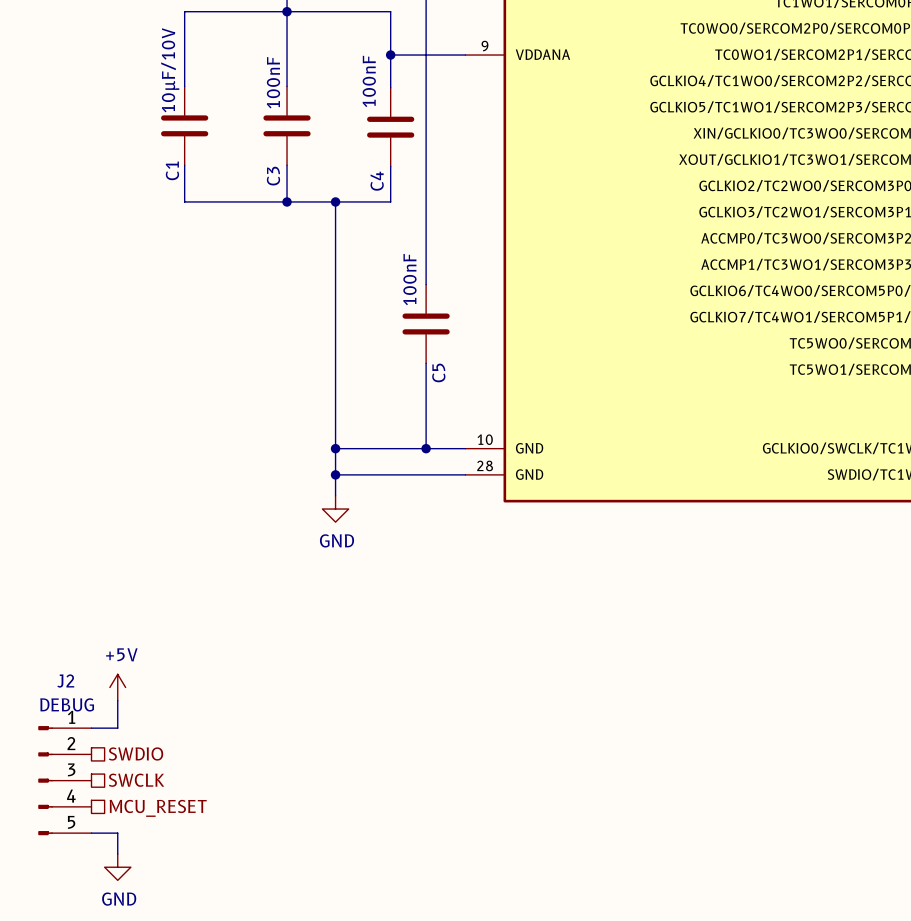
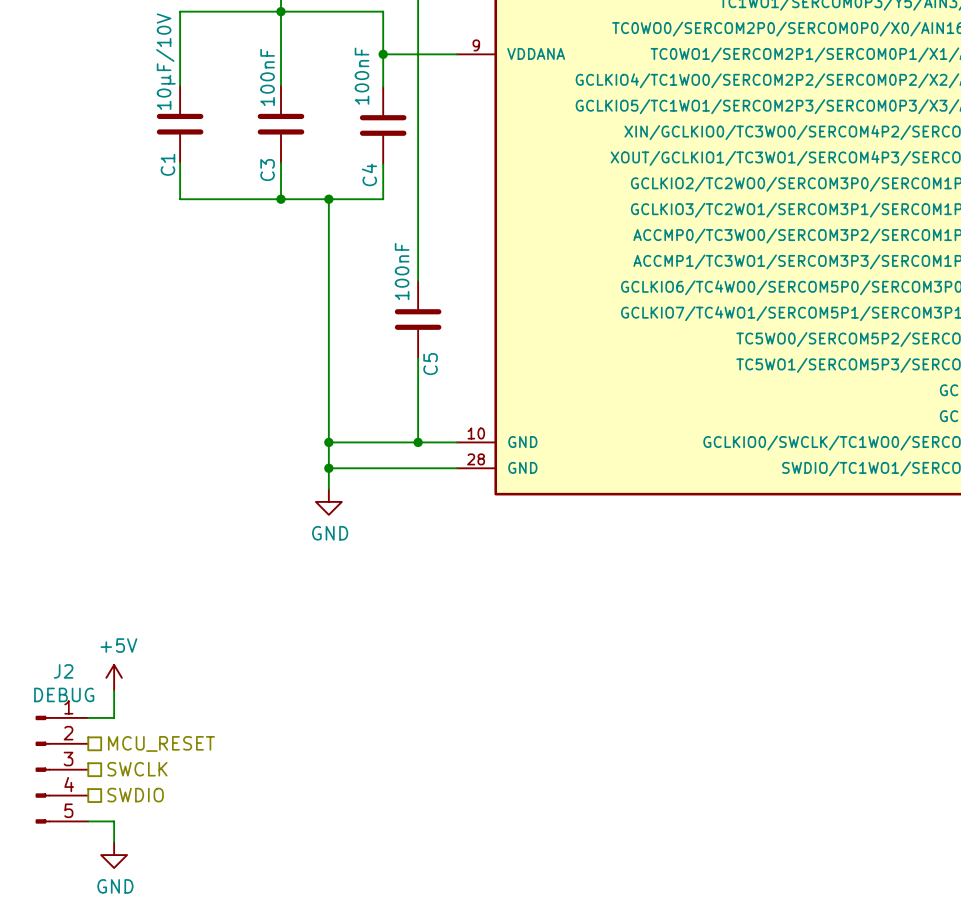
hierarchical label: SWDIO (136, 753) -> MCU_RESET (161, 743)
hierarchical label: MCU_RESET (158, 808) -> SWDIO (135, 795)

